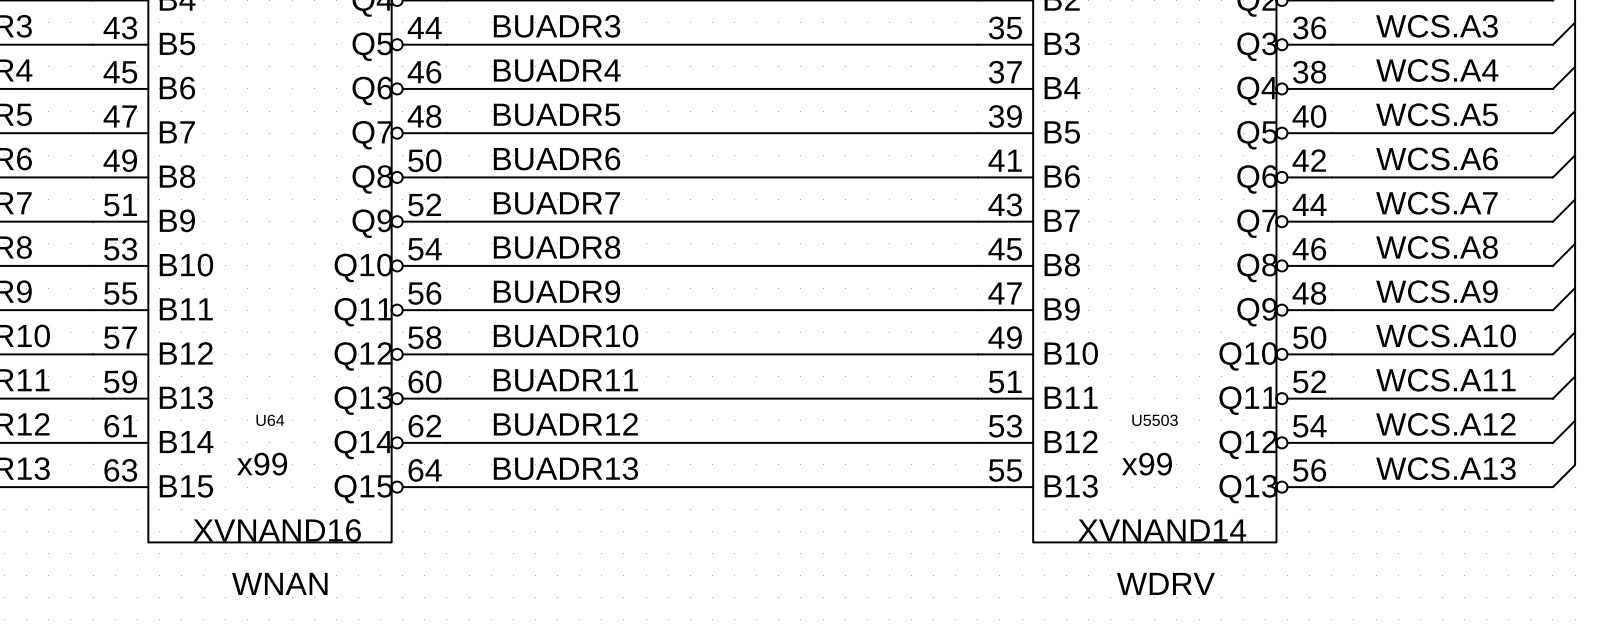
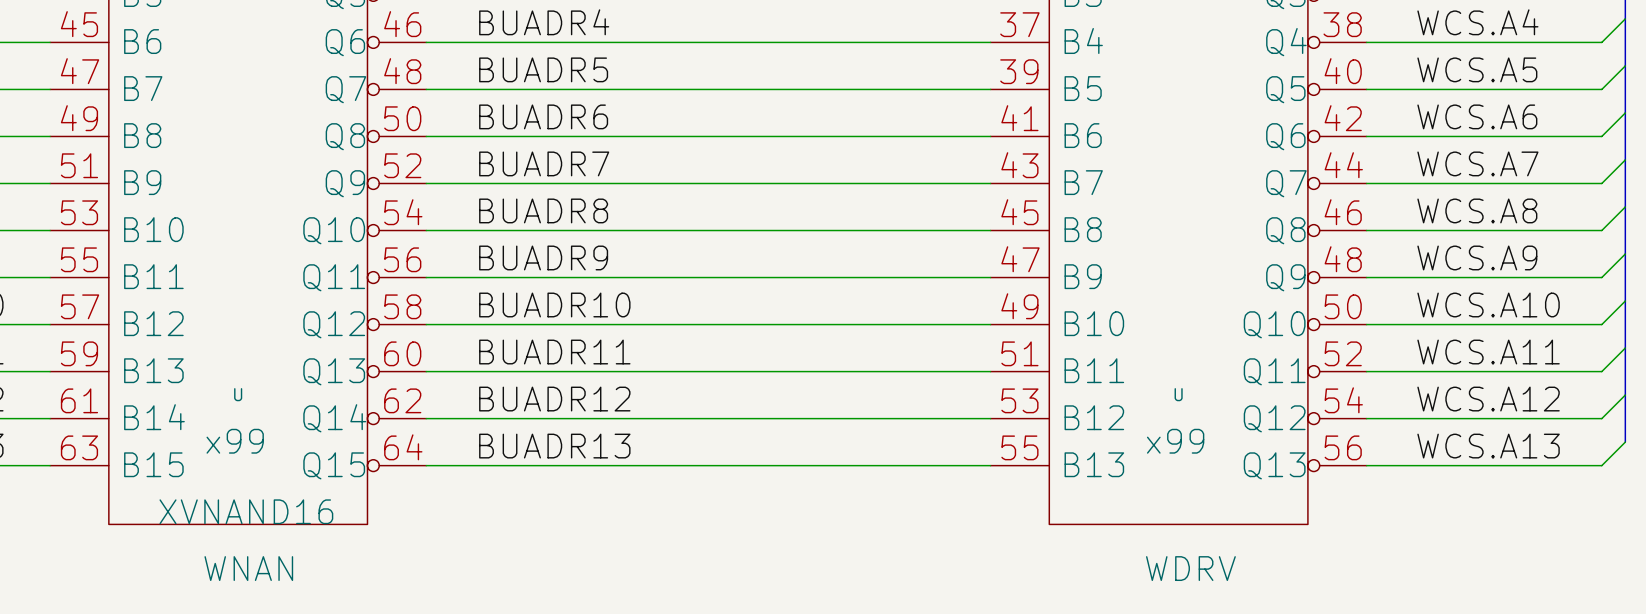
U64 name: U64 (270, 420) -> U (238, 394)
U5503 name: U5503 (1155, 420) -> U (1178, 394)
U5503 value: XVNAND14 (1162, 530) -> none

